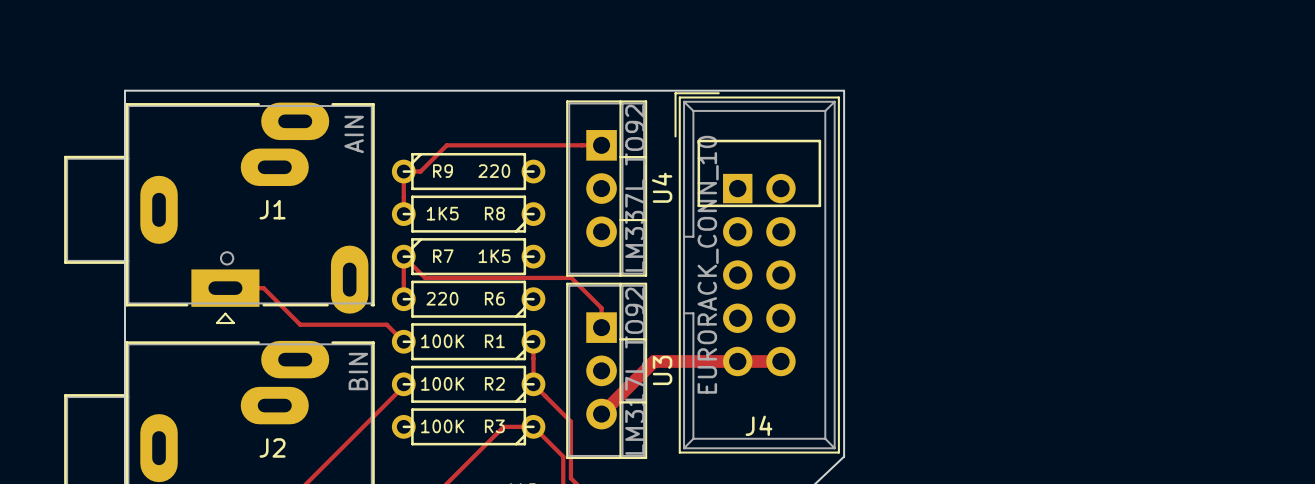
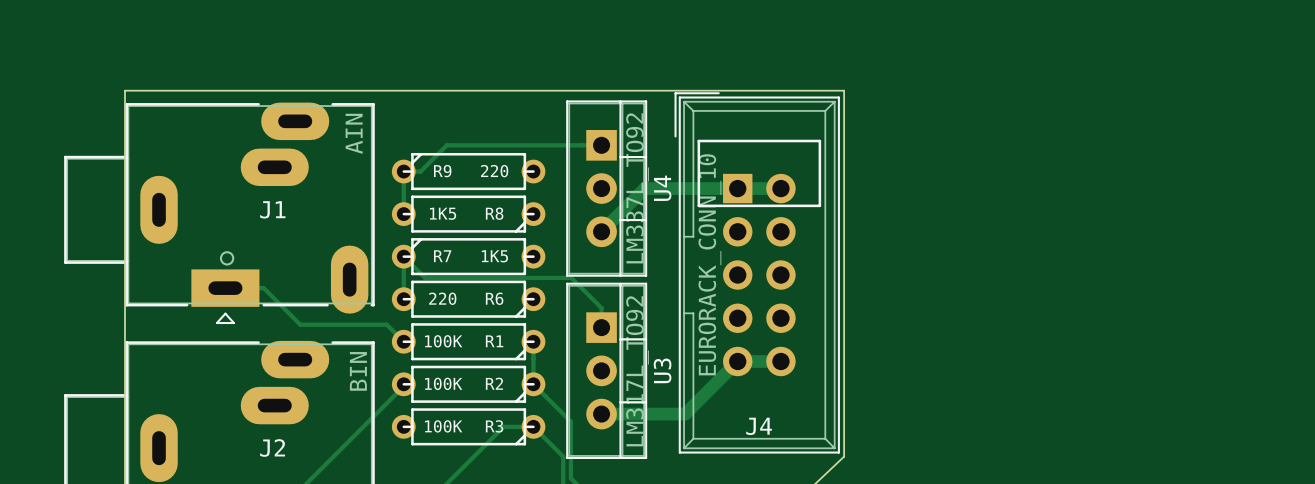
track: none -> (780, 188) (644, 188) (601, 231)
track: (737, 361) (654, 361) (601, 414) -> (737, 361) (685, 414) (601, 414)

